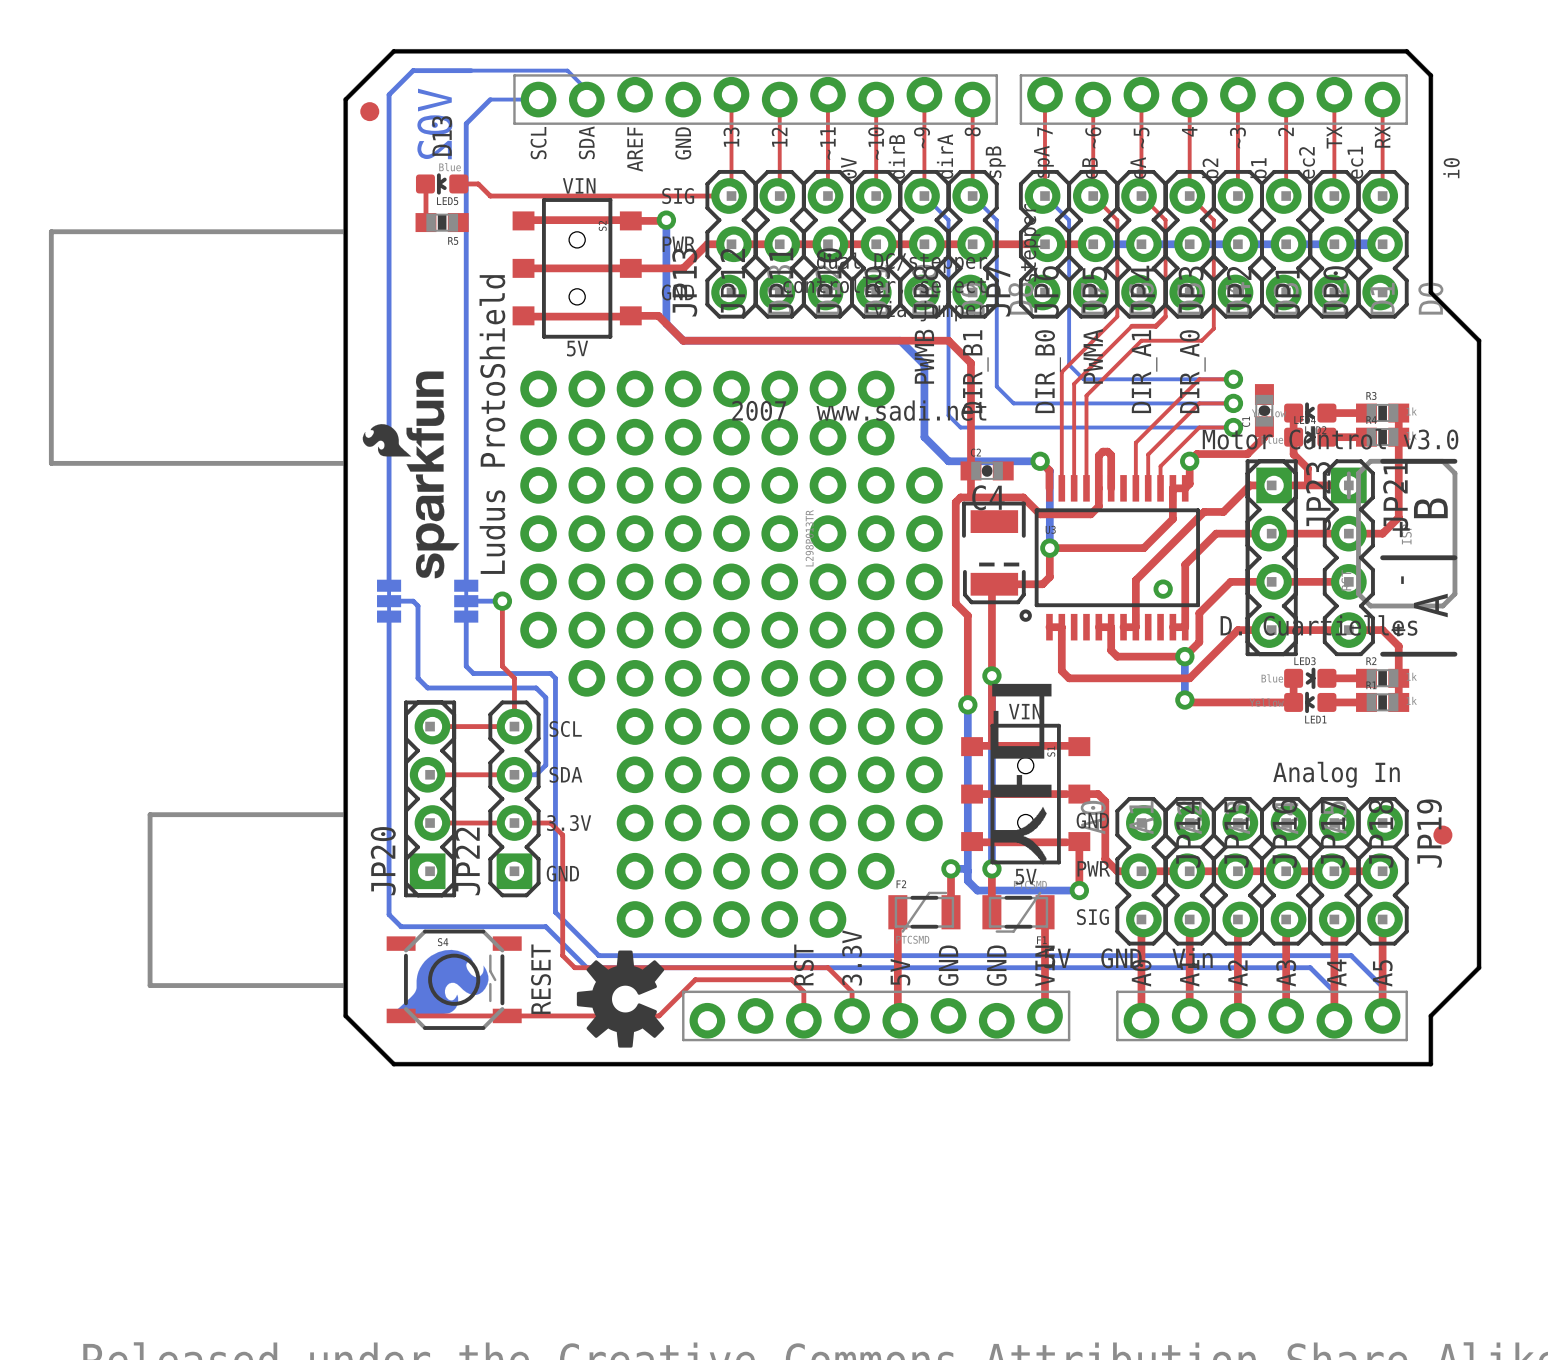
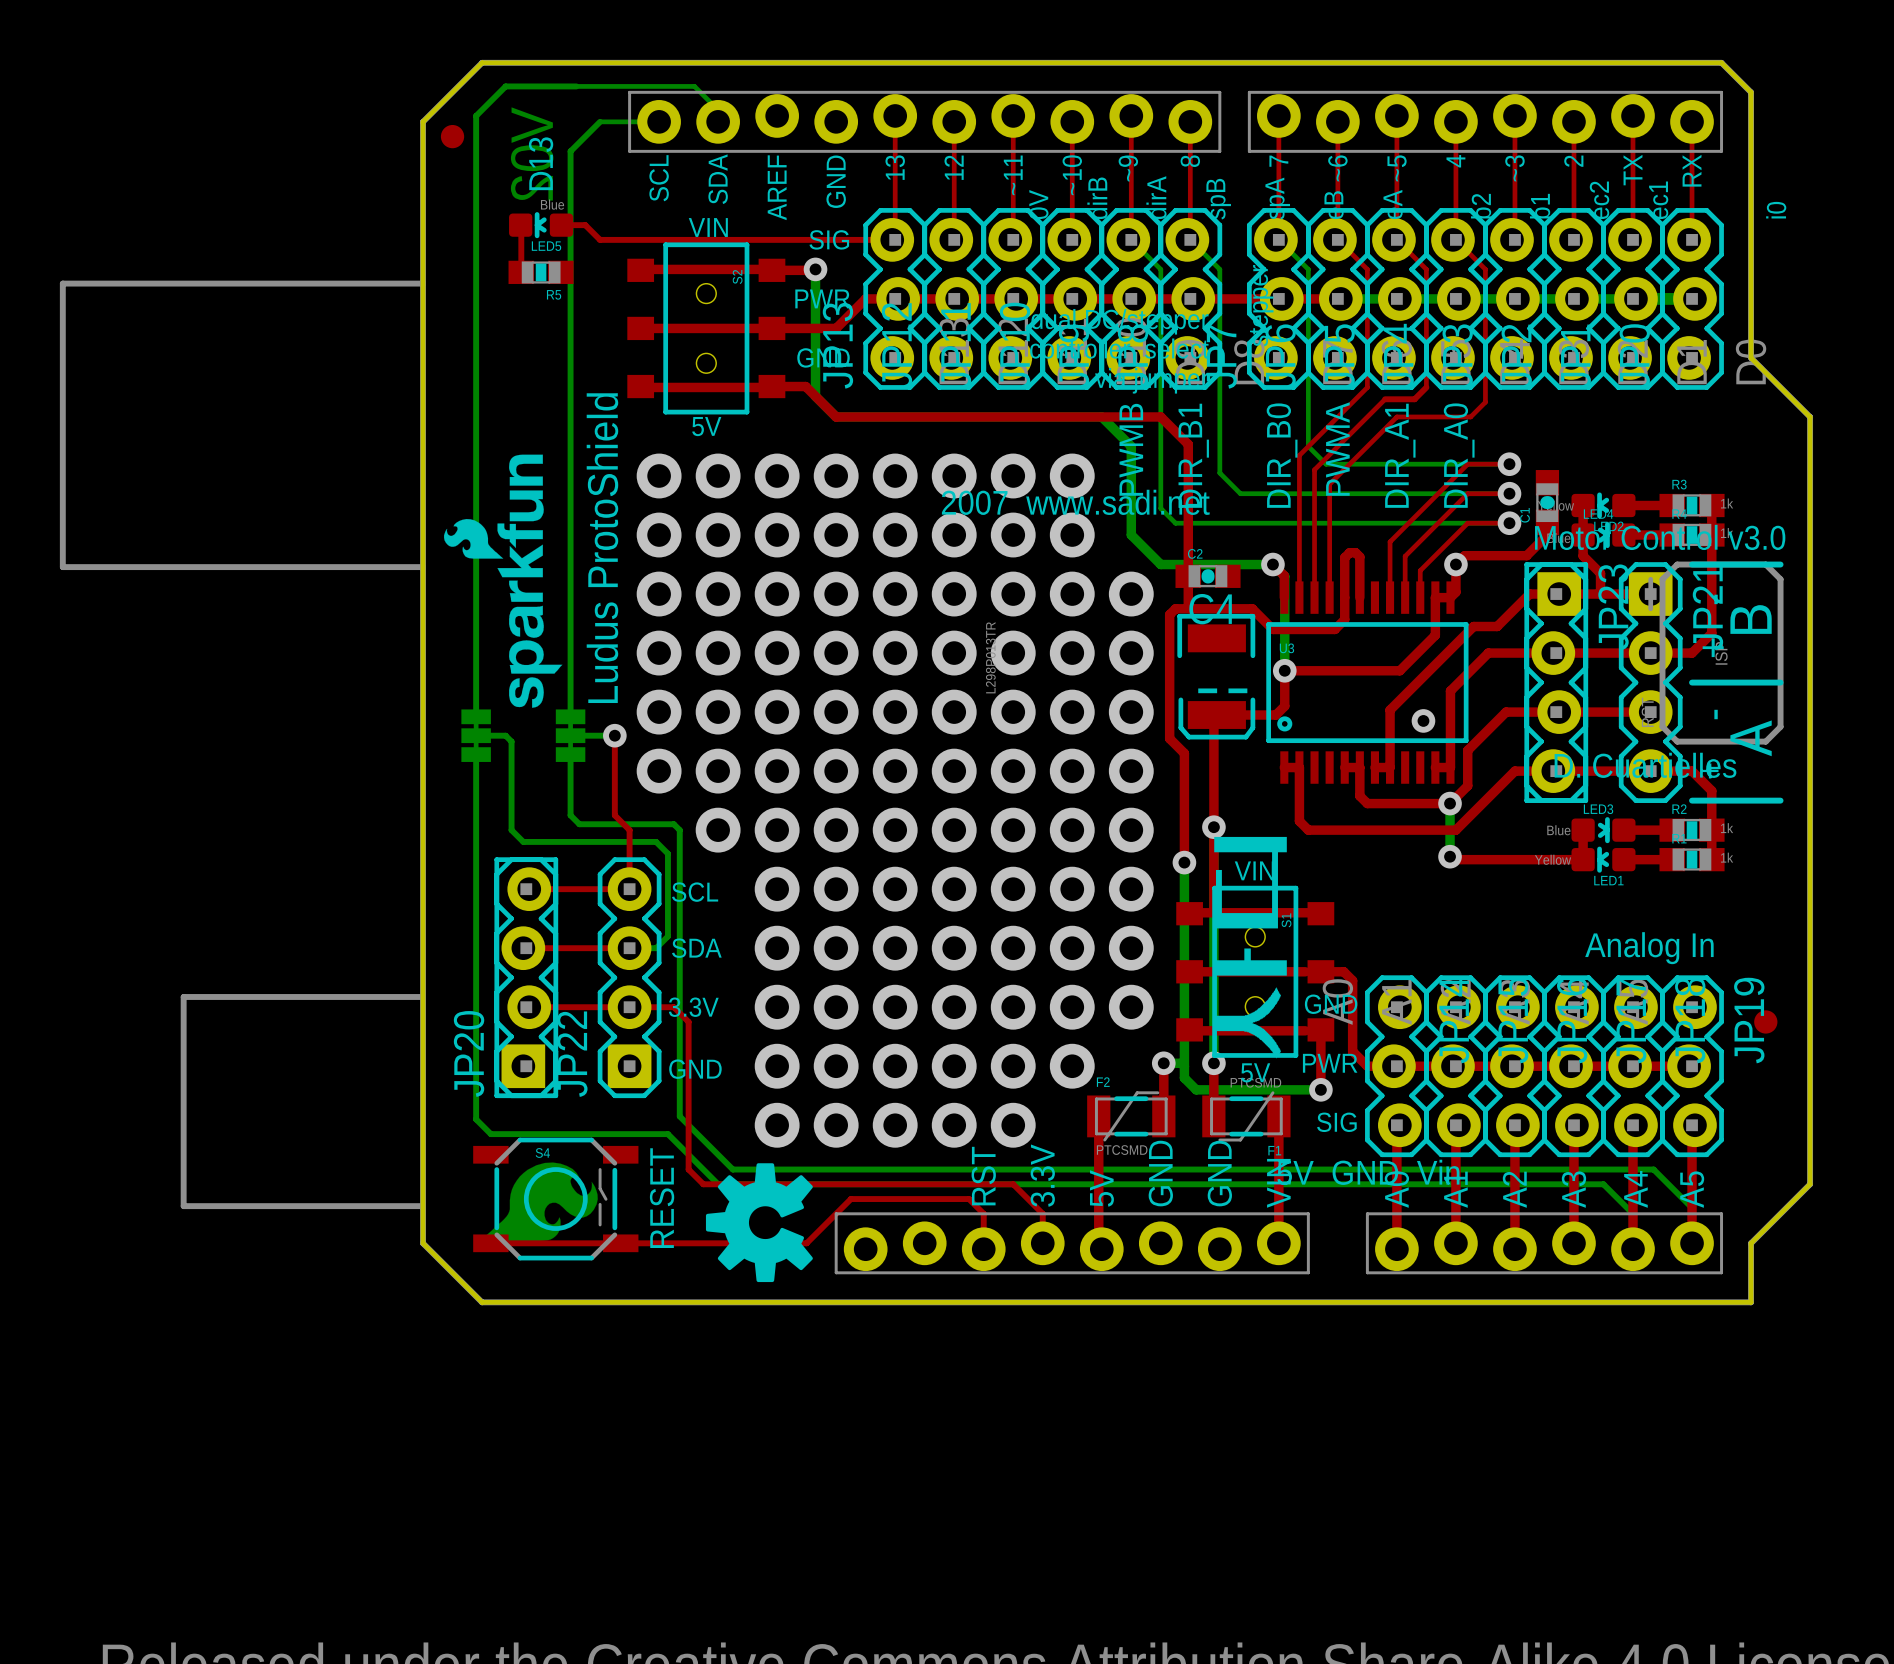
U3 footprint: [1019, 475, 1200, 641] -> [1266, 581, 1469, 784]

